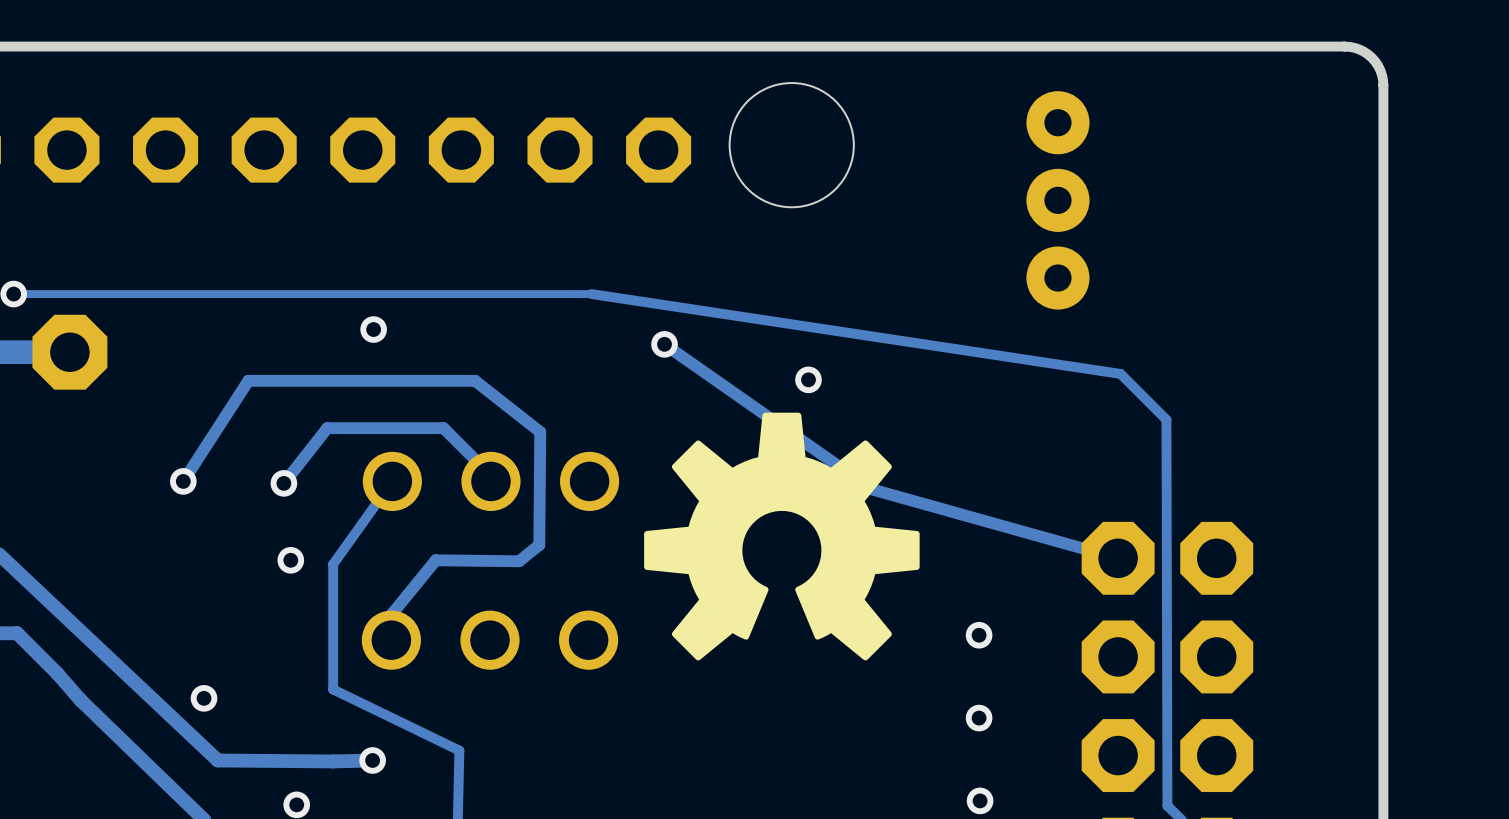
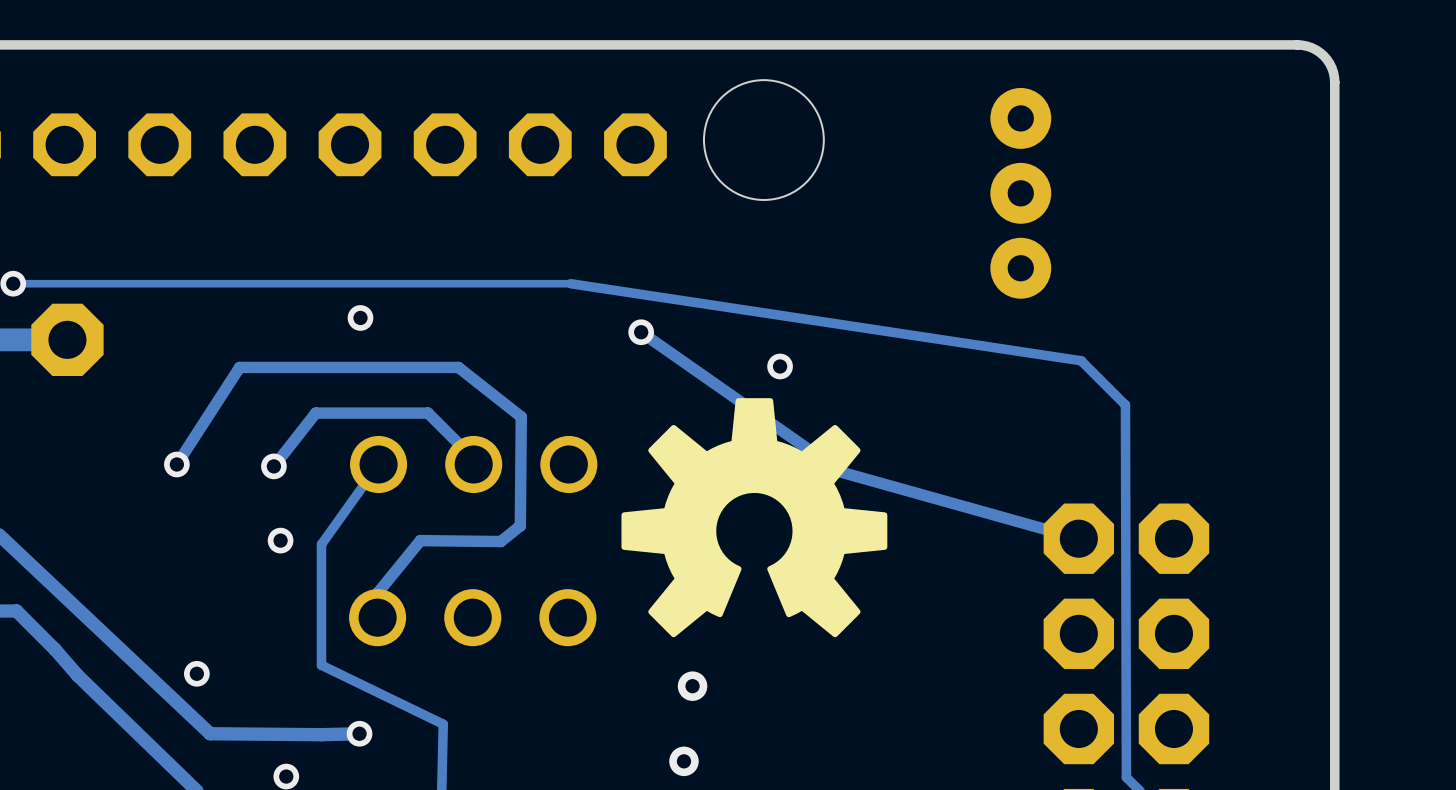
via: (979, 635) -> none
via: none -> (692, 686)
via: (979, 718) -> none
via: none -> (683, 761)
via: (980, 800) -> none

